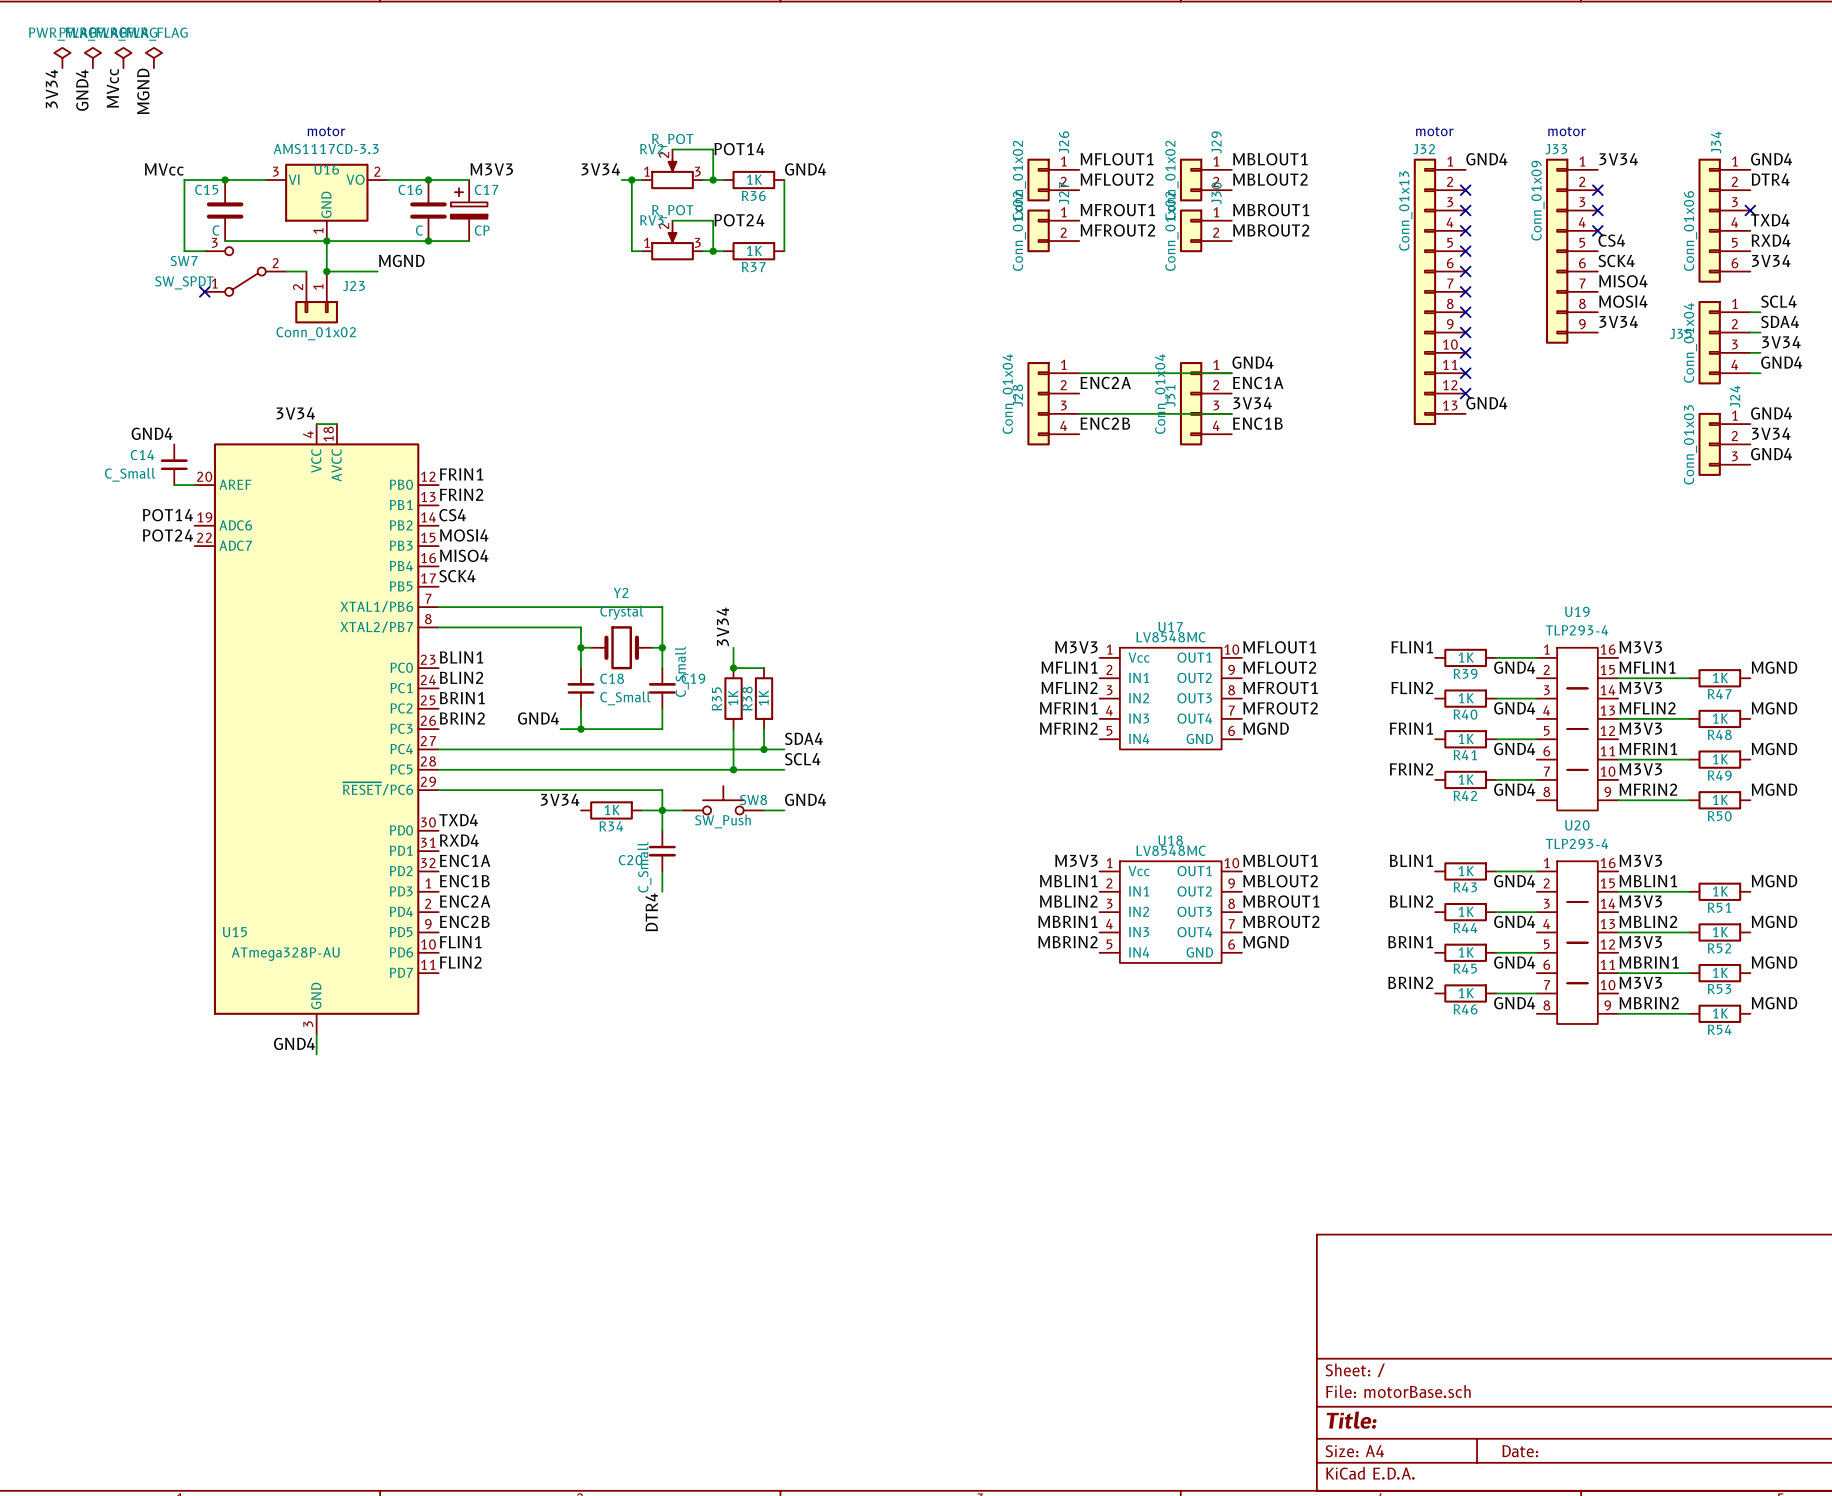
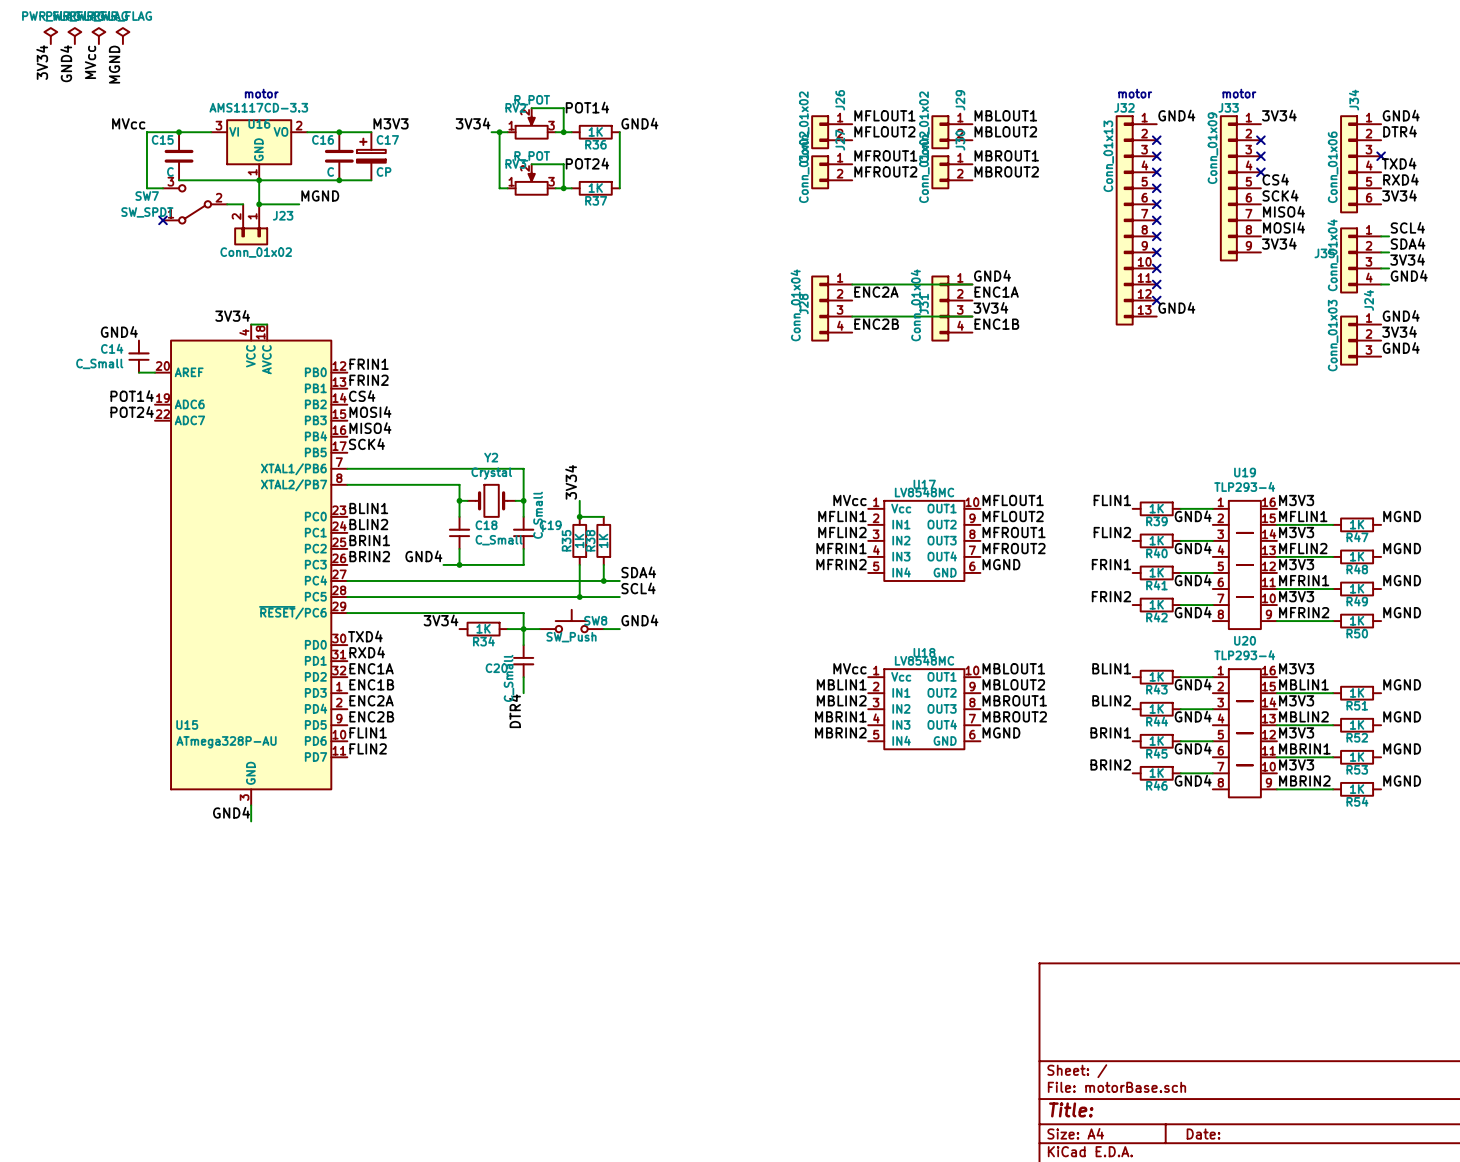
label: M3V3 (1076, 647) -> MVcc (849, 500)
label: M3V3 (1076, 860) -> MVcc (849, 668)

